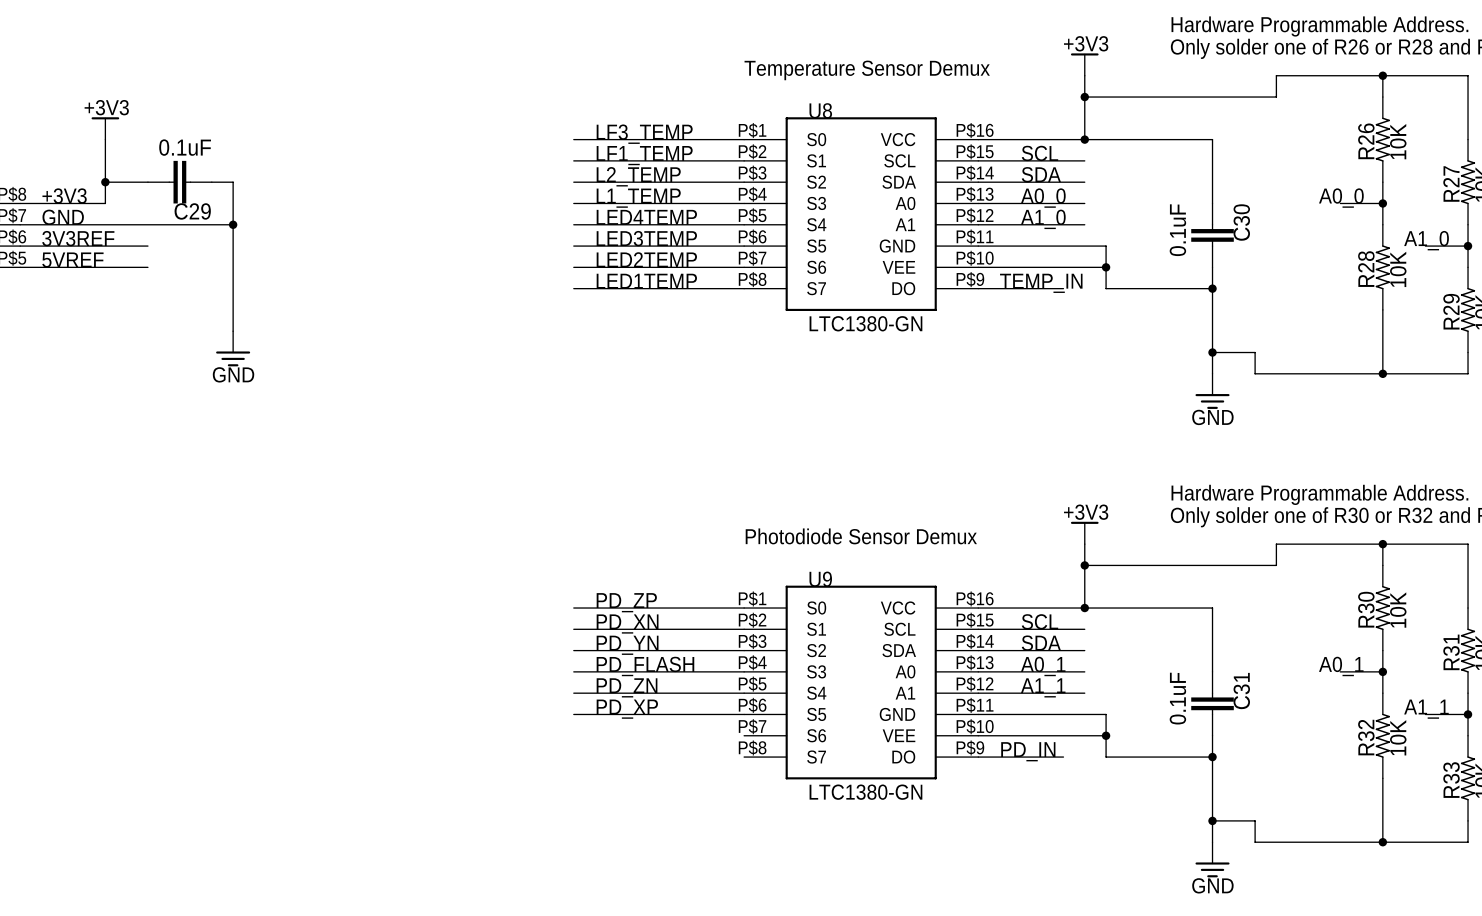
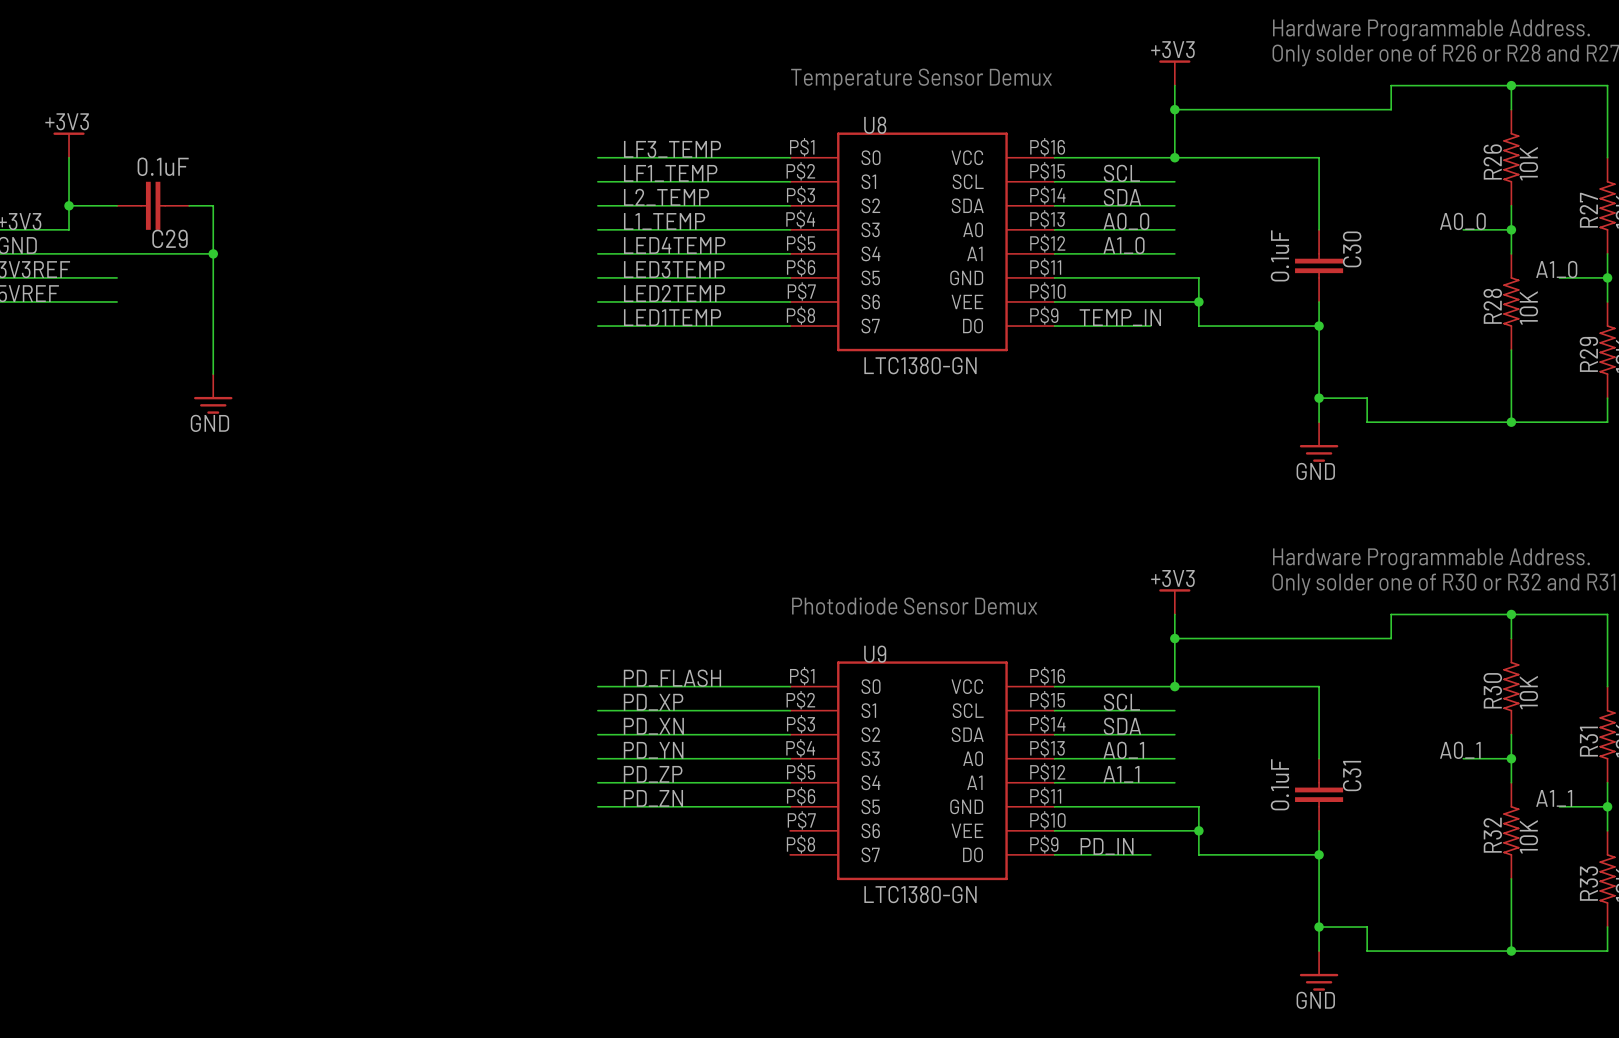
label: PD_ZP (626, 602) -> PD_FLASH (672, 678)
label: PD_XN (627, 624) -> PD_XP (653, 702)
label: PD_YN (627, 645) -> PD_XN (653, 726)
label: PD_FLASH (645, 666) -> PD_YN (653, 750)
label: PD_ZN (627, 687) -> PD_ZP (653, 774)
label: PD_XP (627, 709) -> PD_ZN (653, 798)

